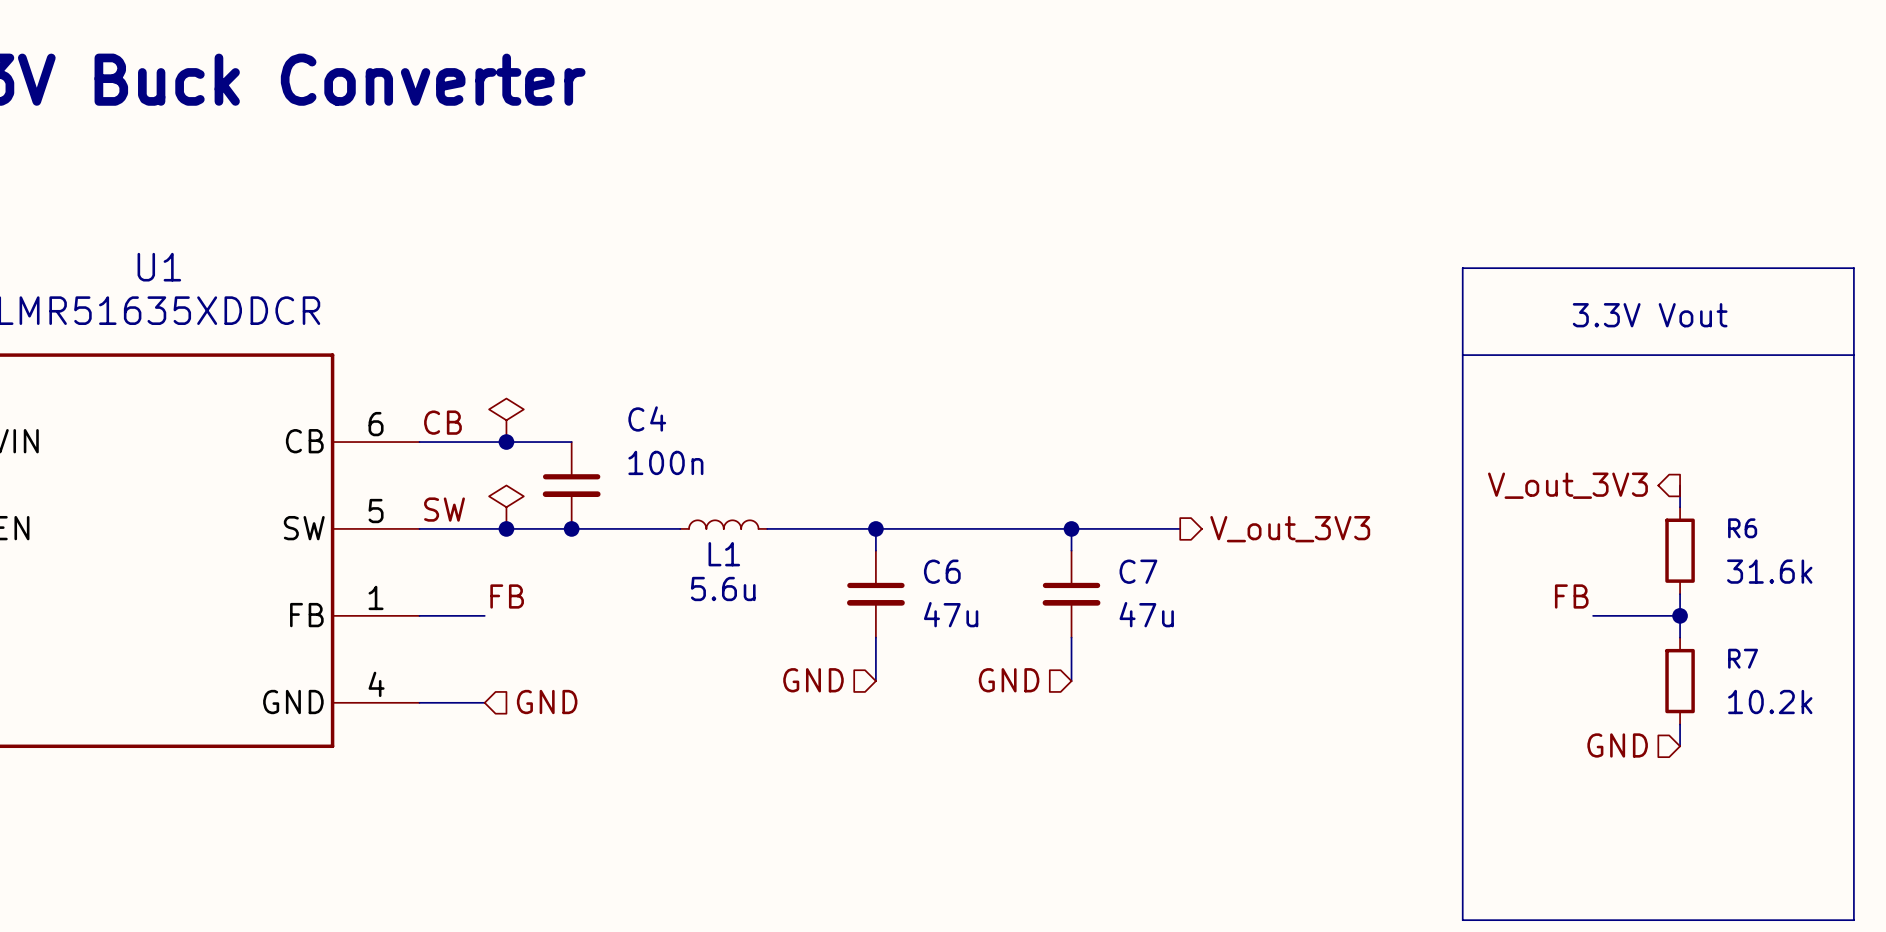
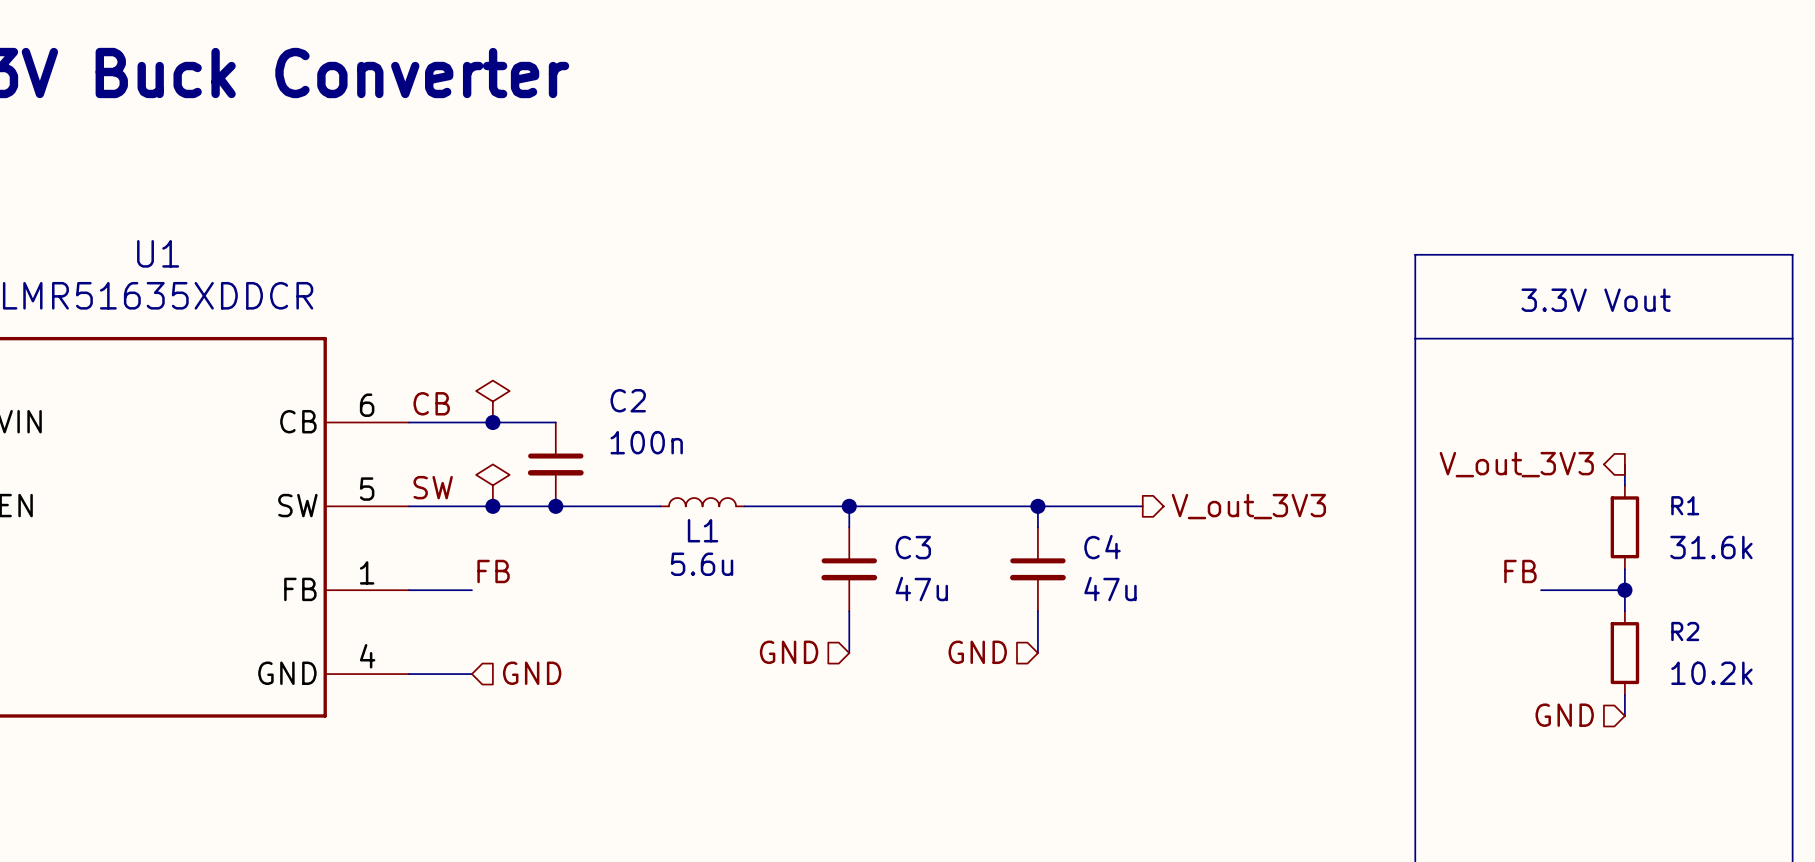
C4 name: C4 (647, 418) -> C2 (628, 400)
R6 name: R6 (1742, 528) -> R1 (1685, 505)
C6 name: C6 (942, 571) -> C3 (913, 547)
C7 name: C7 (1138, 571) -> C4 (1102, 547)
R7 name: R7 (1743, 658) -> R2 (1685, 631)

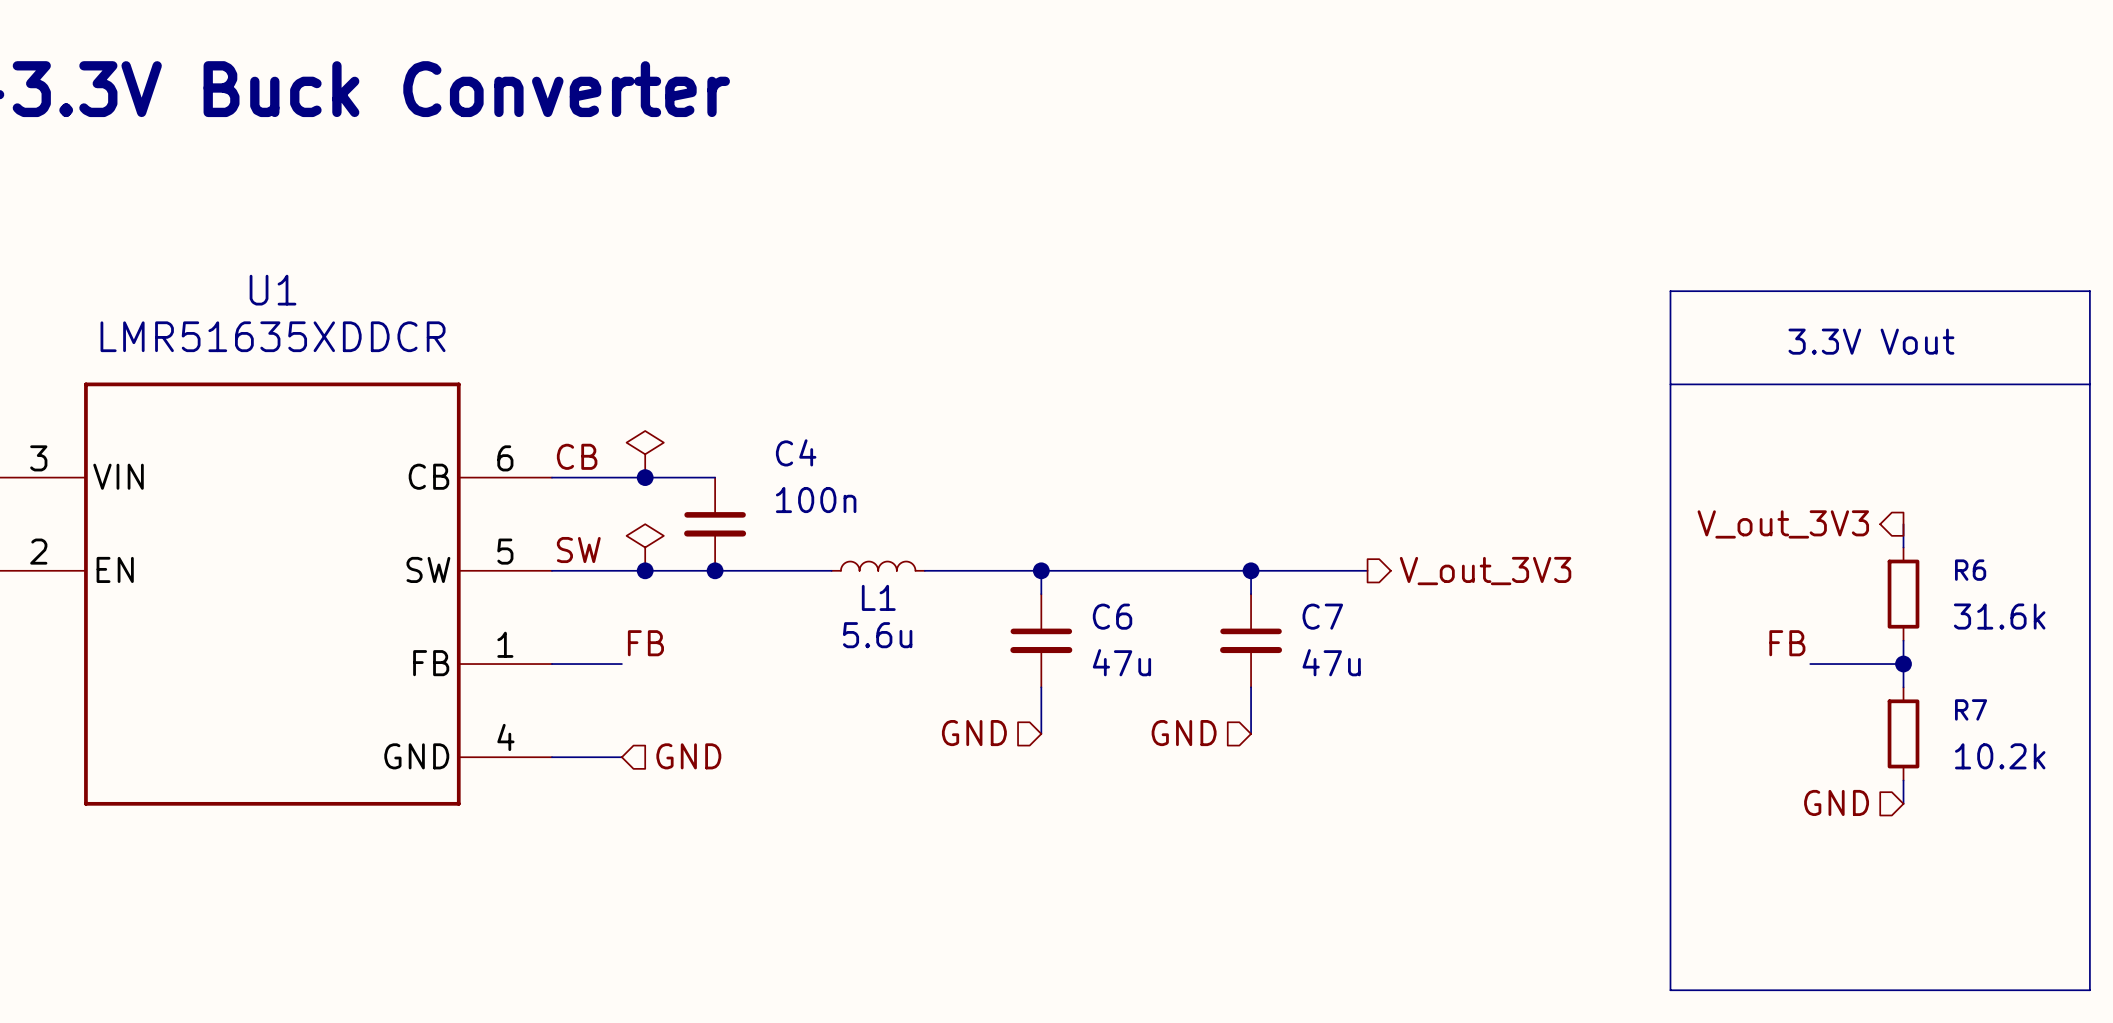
C2 name: C2 (628, 400) -> C4 (796, 452)
R1 name: R1 (1685, 505) -> R6 (1970, 570)
C3 name: C3 (913, 547) -> C6 (1112, 616)
C4 name: C4 (1102, 547) -> C7 (1322, 616)
R2 name: R2 (1685, 631) -> R7 (1971, 709)

